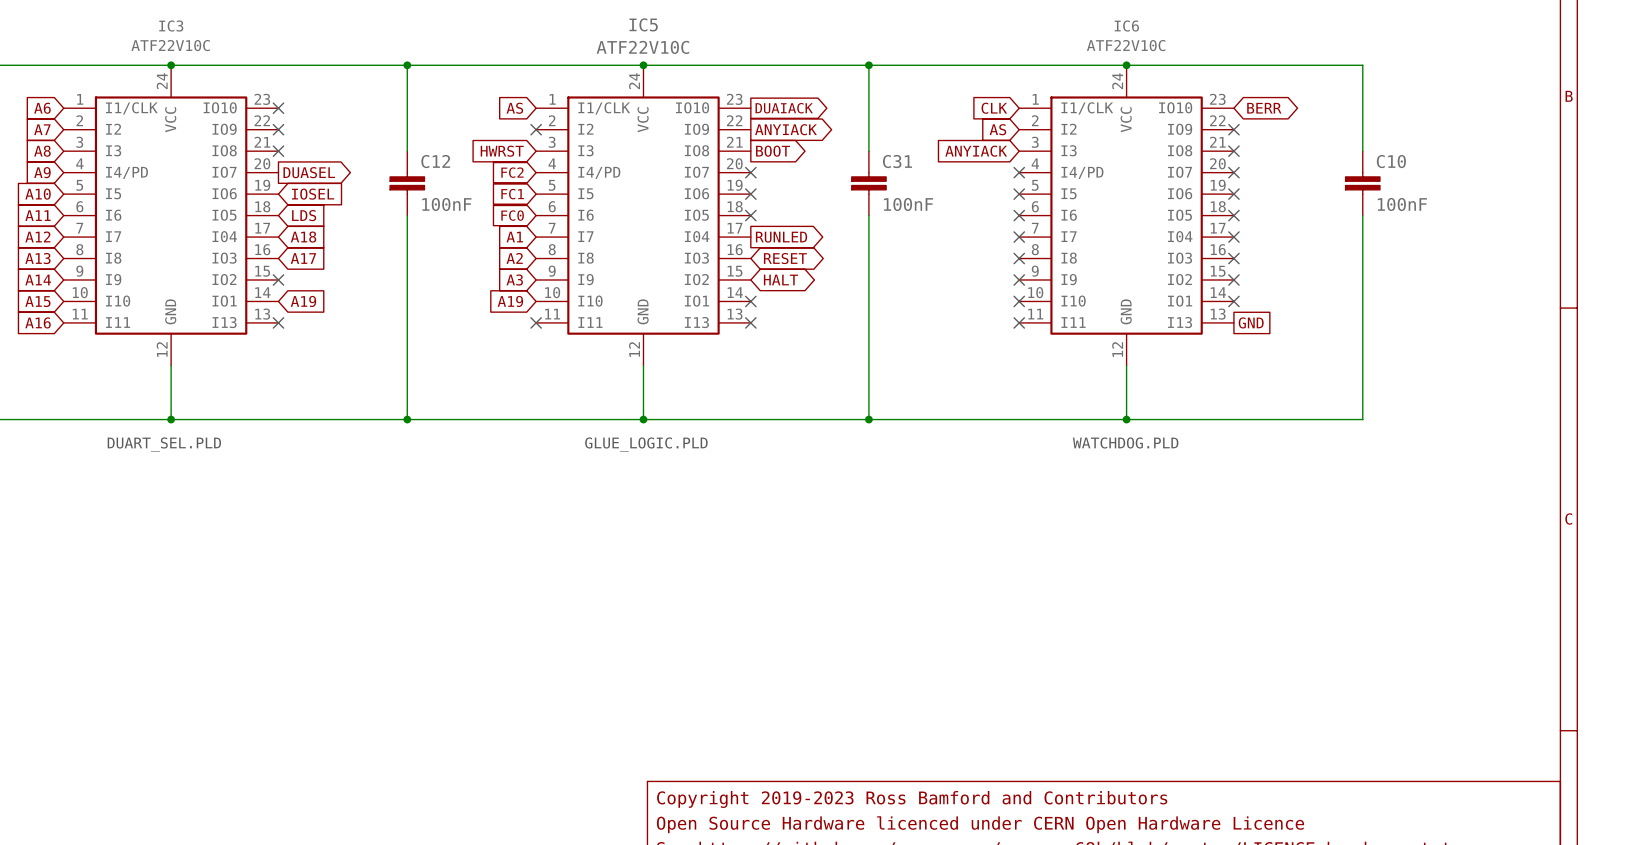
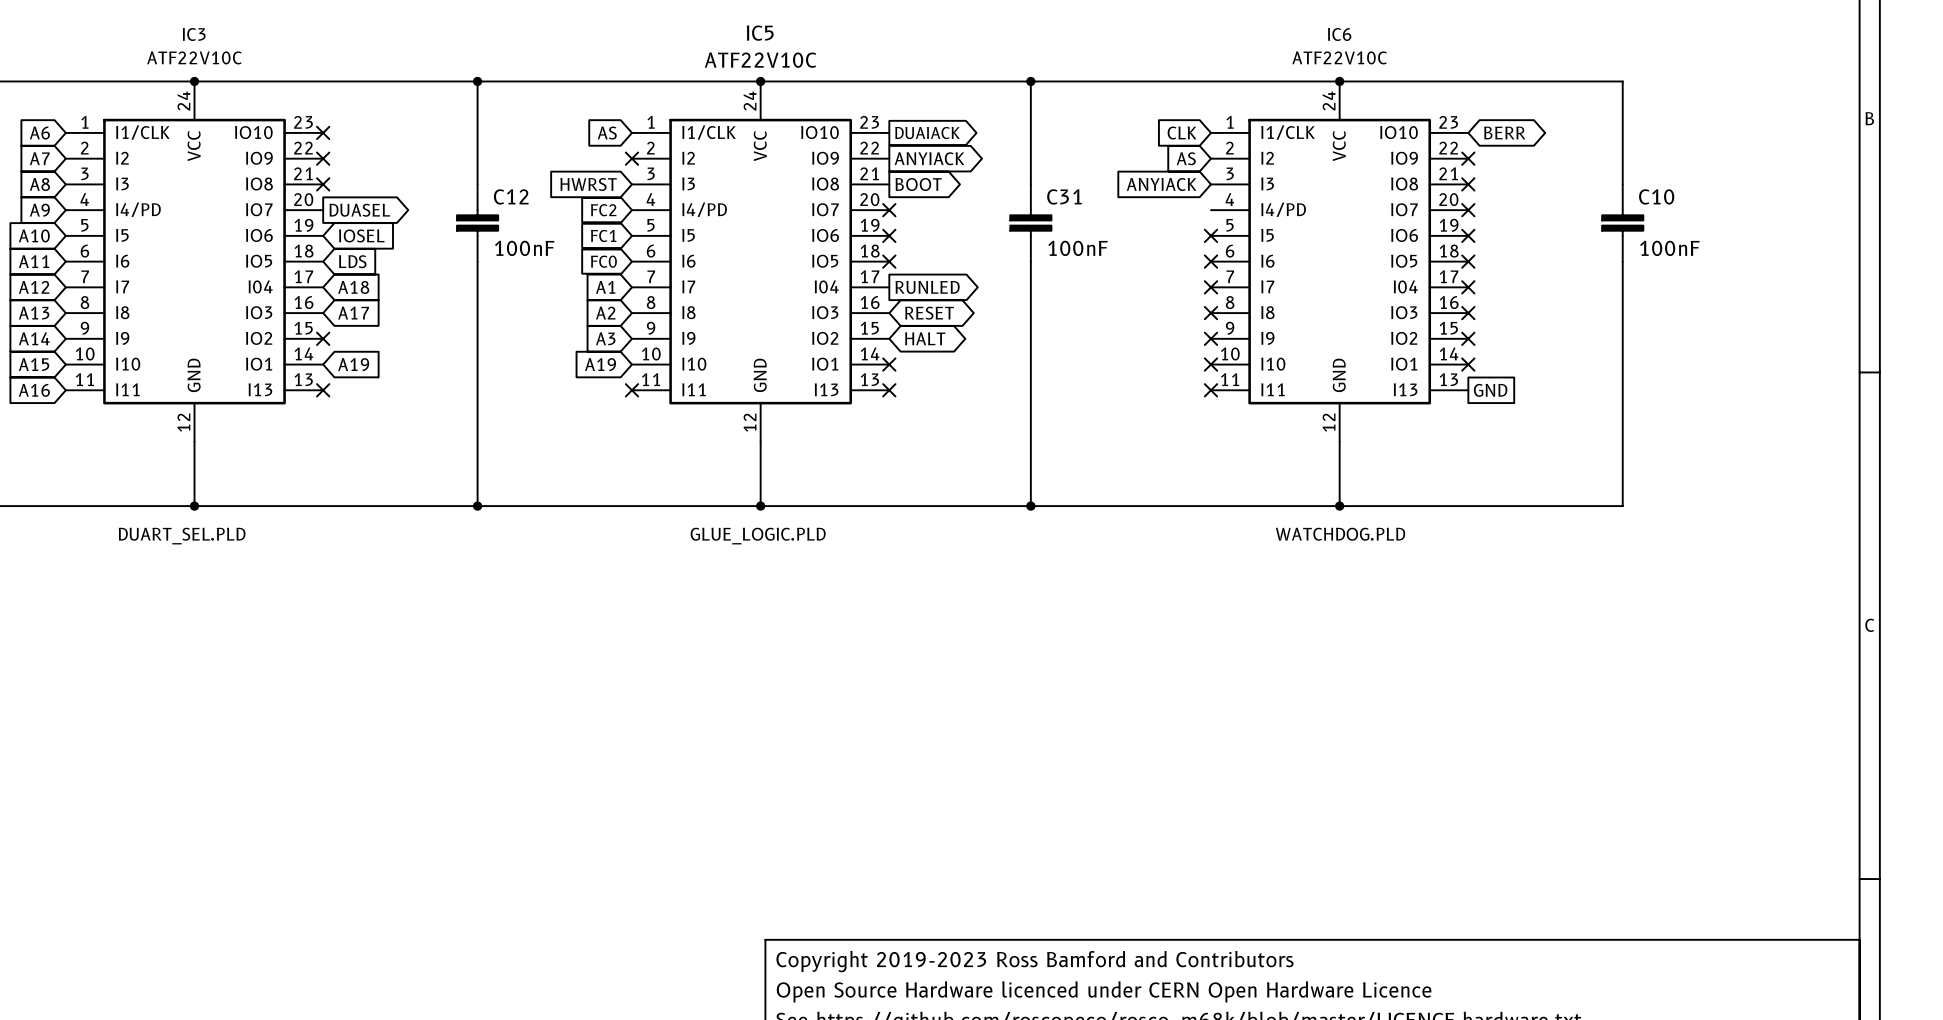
no-connect mark: (1019, 172) -> none

